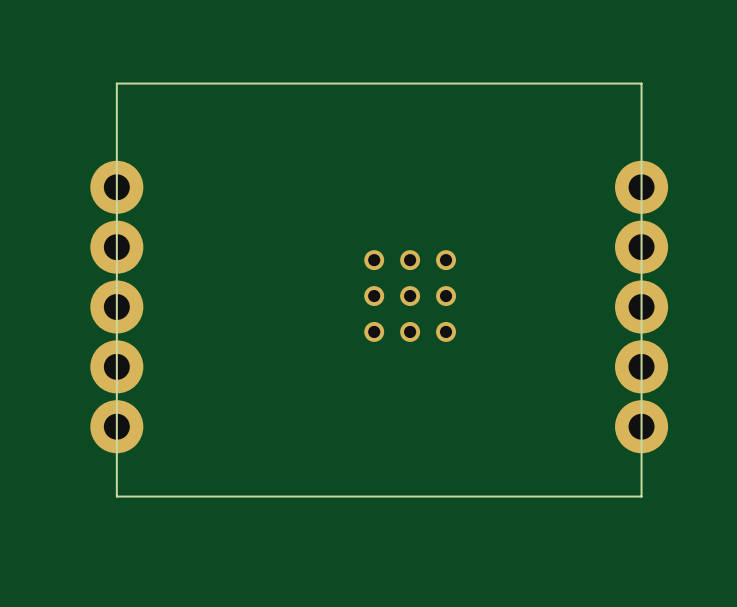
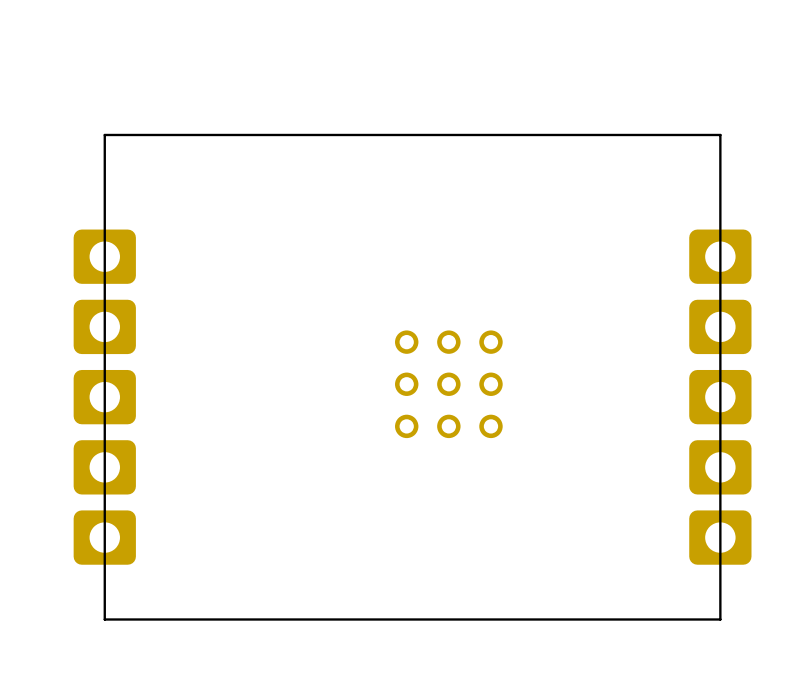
part footprint: [90, 160, 144, 454] -> [73, 229, 136, 565]
part footprint: [615, 160, 669, 454] -> [689, 229, 752, 565]

